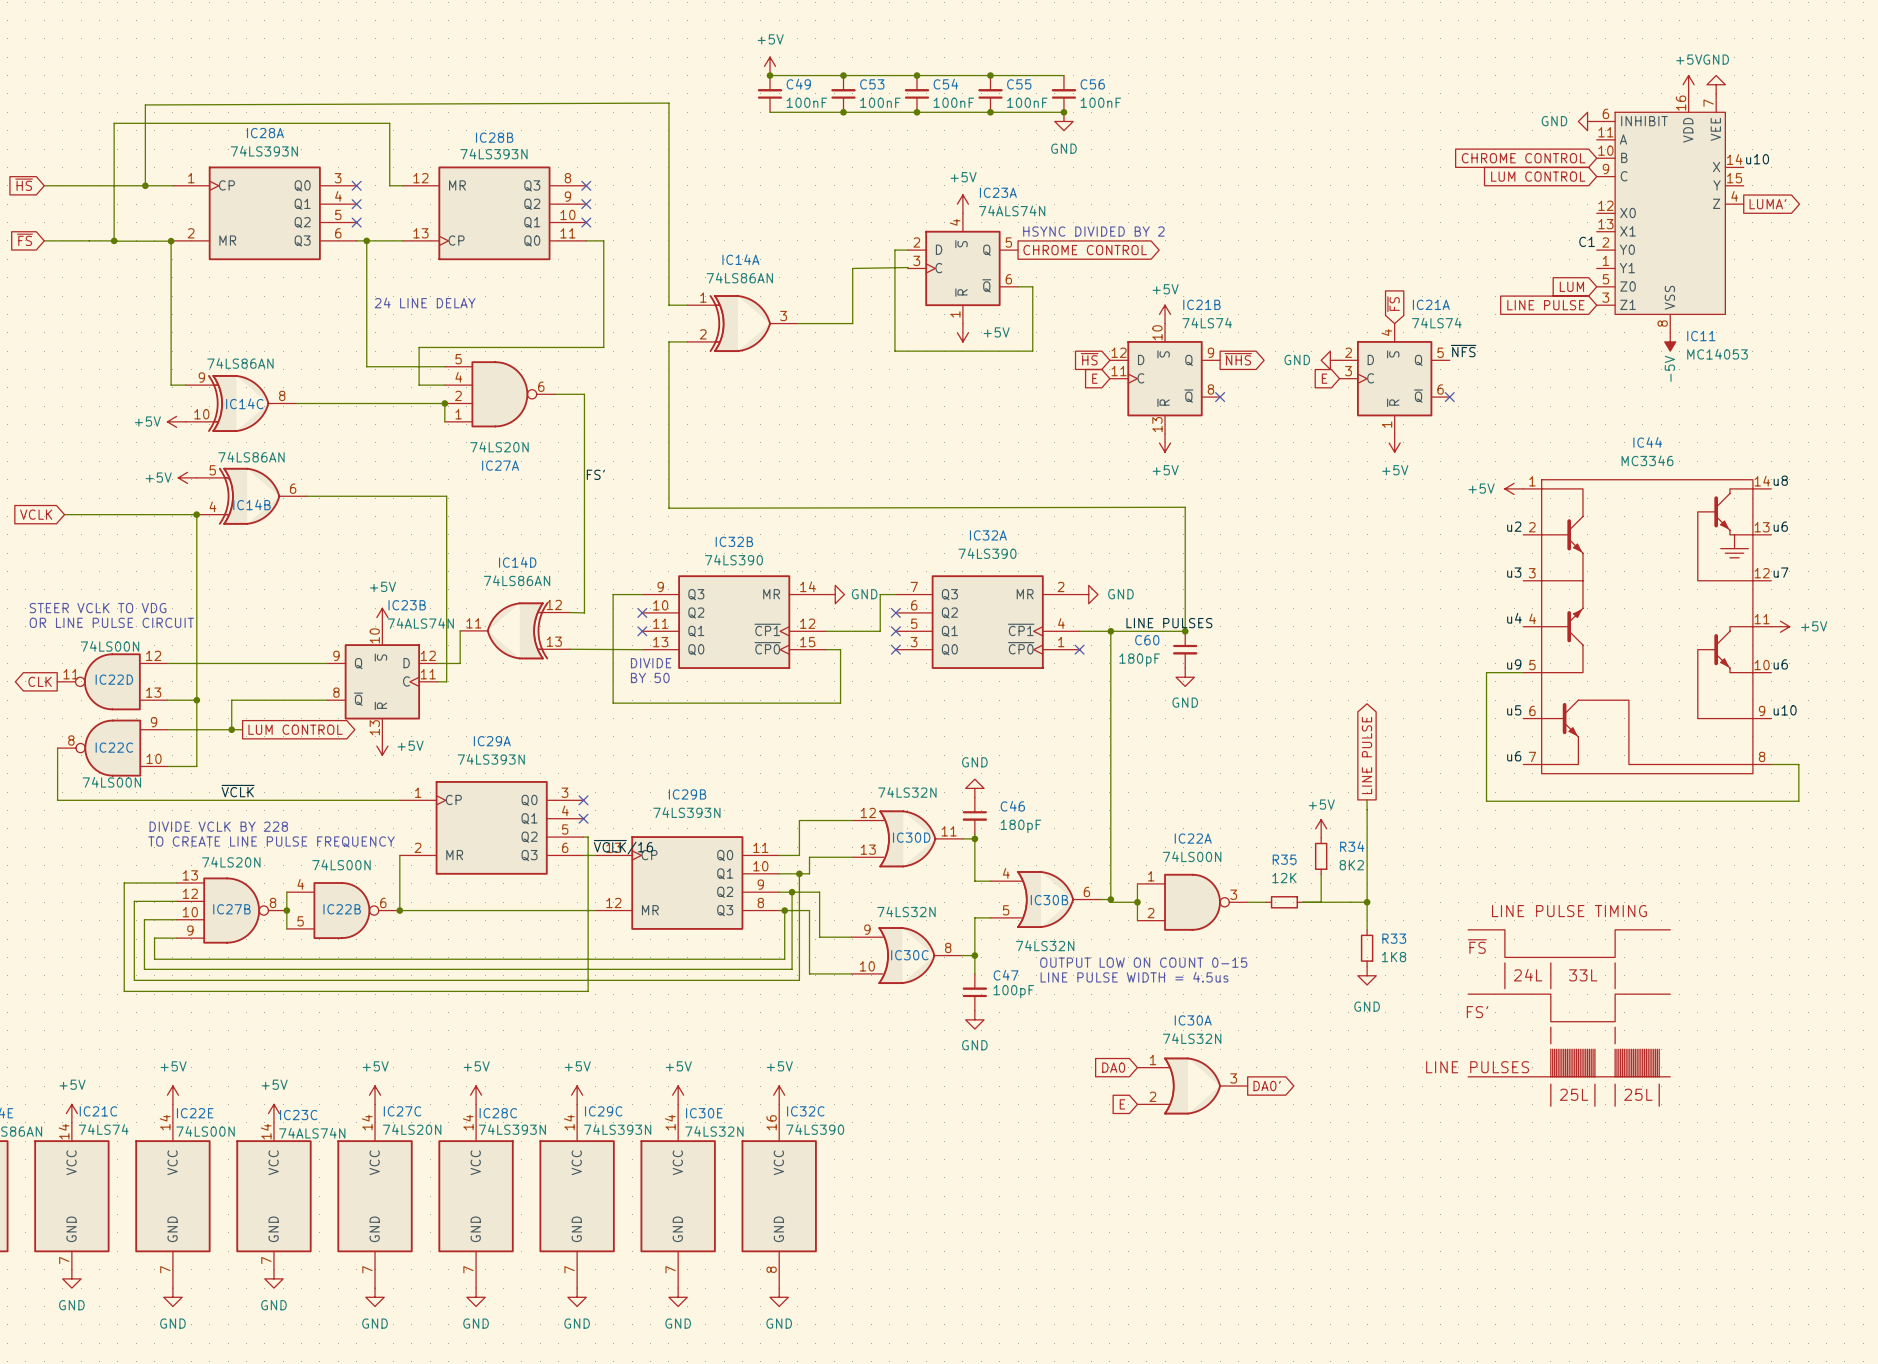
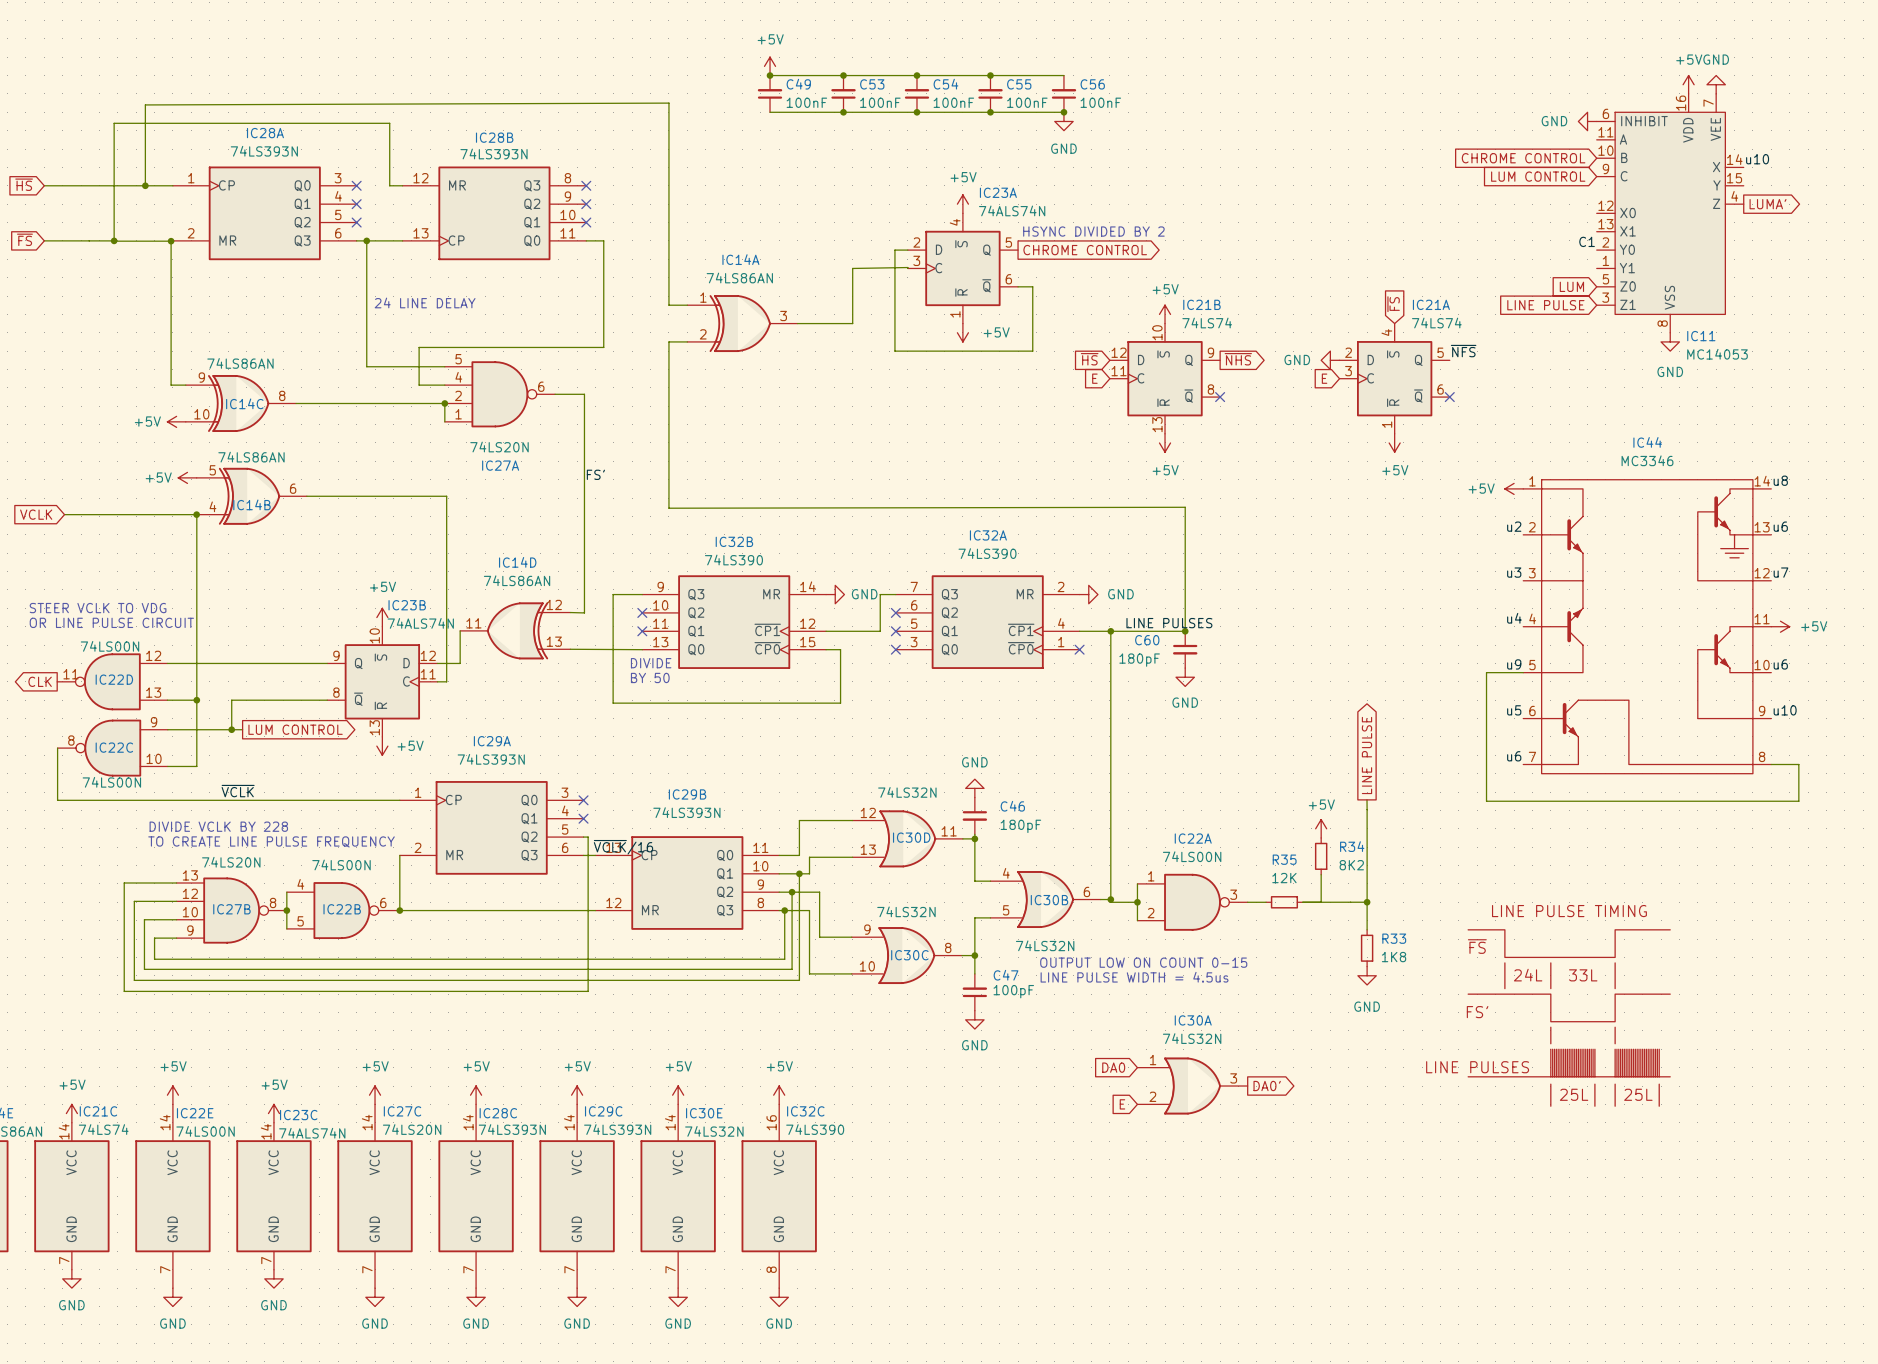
power symbol: -5V (1670, 341) -> GND (1670, 341)

